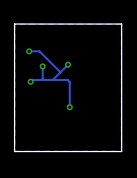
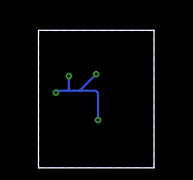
track: (29, 51) (39, 51) (60, 72) -> none
via: (29, 51) -> none

